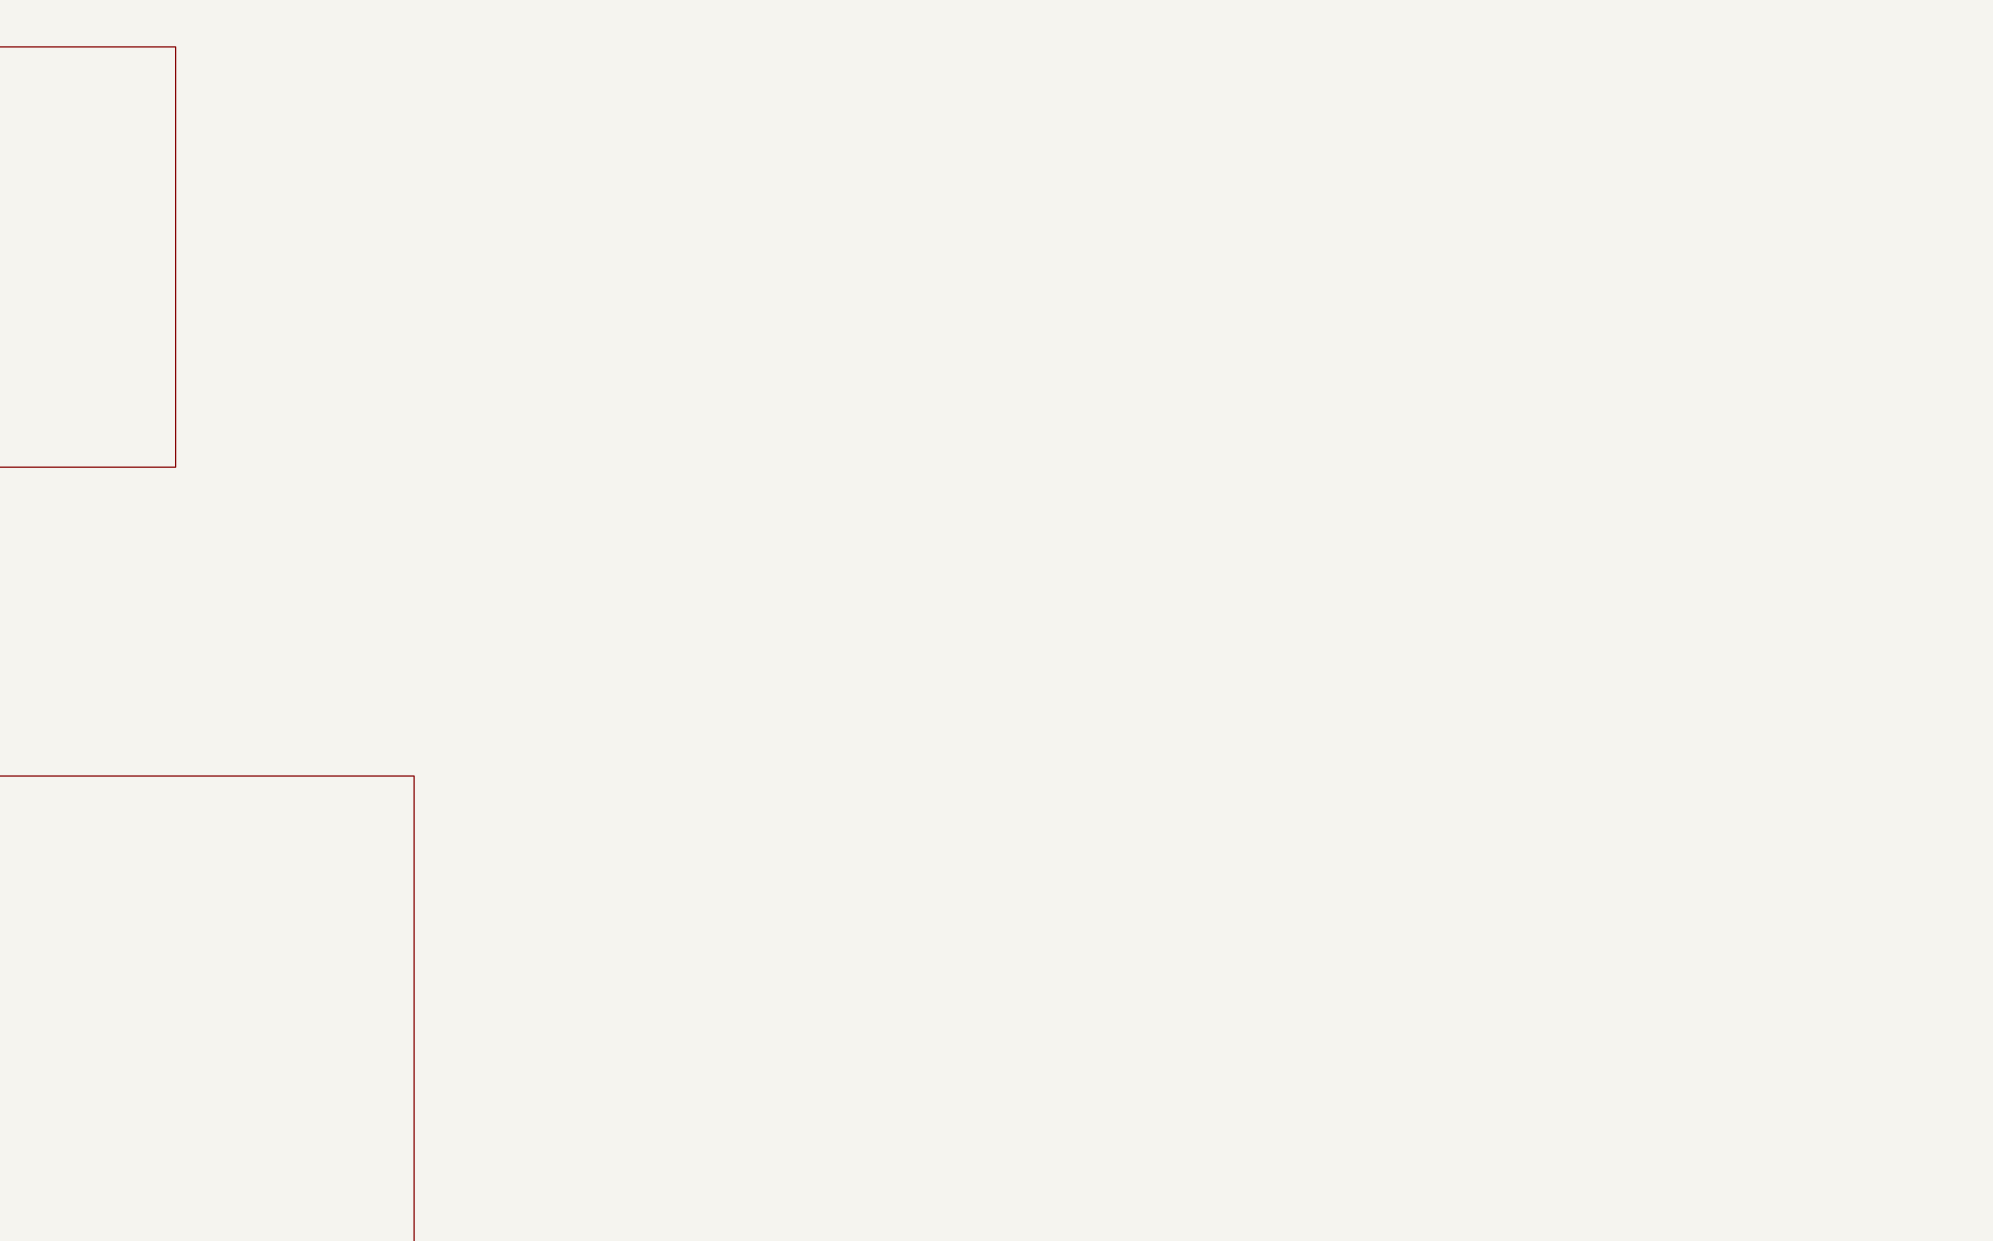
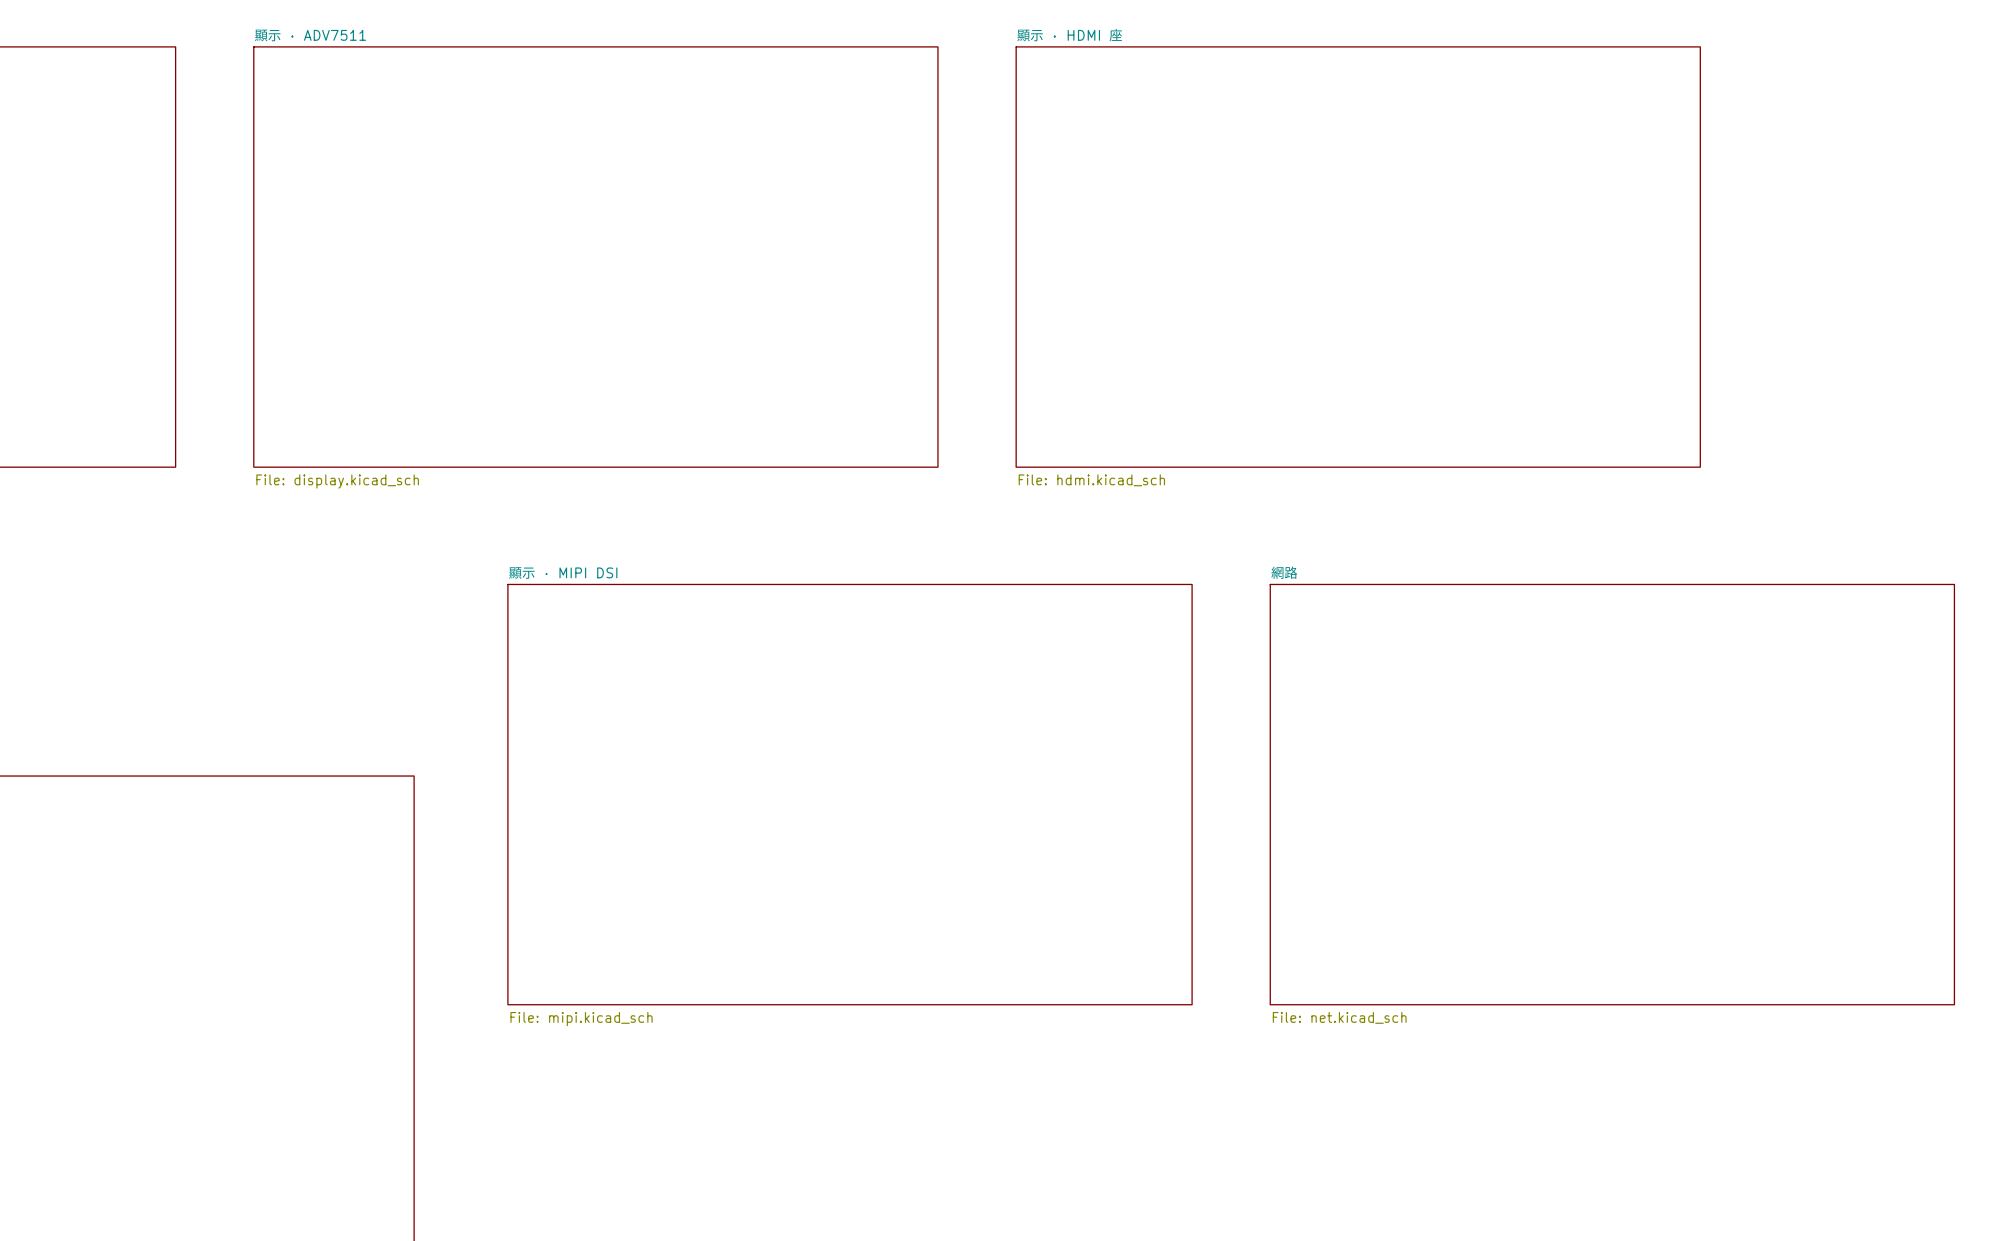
sheet 顯示 · ADV7511: none -> File: display.kicad_sch (595, 257)
sheet 顯示 · HDMI 座: none -> File: hdmi.kicad_sch (1358, 257)
sheet 顯示 · MIPI DSI: none -> File: mipi.kicad_sch (850, 794)
sheet 網路: none -> File: net.kicad_sch (1612, 794)

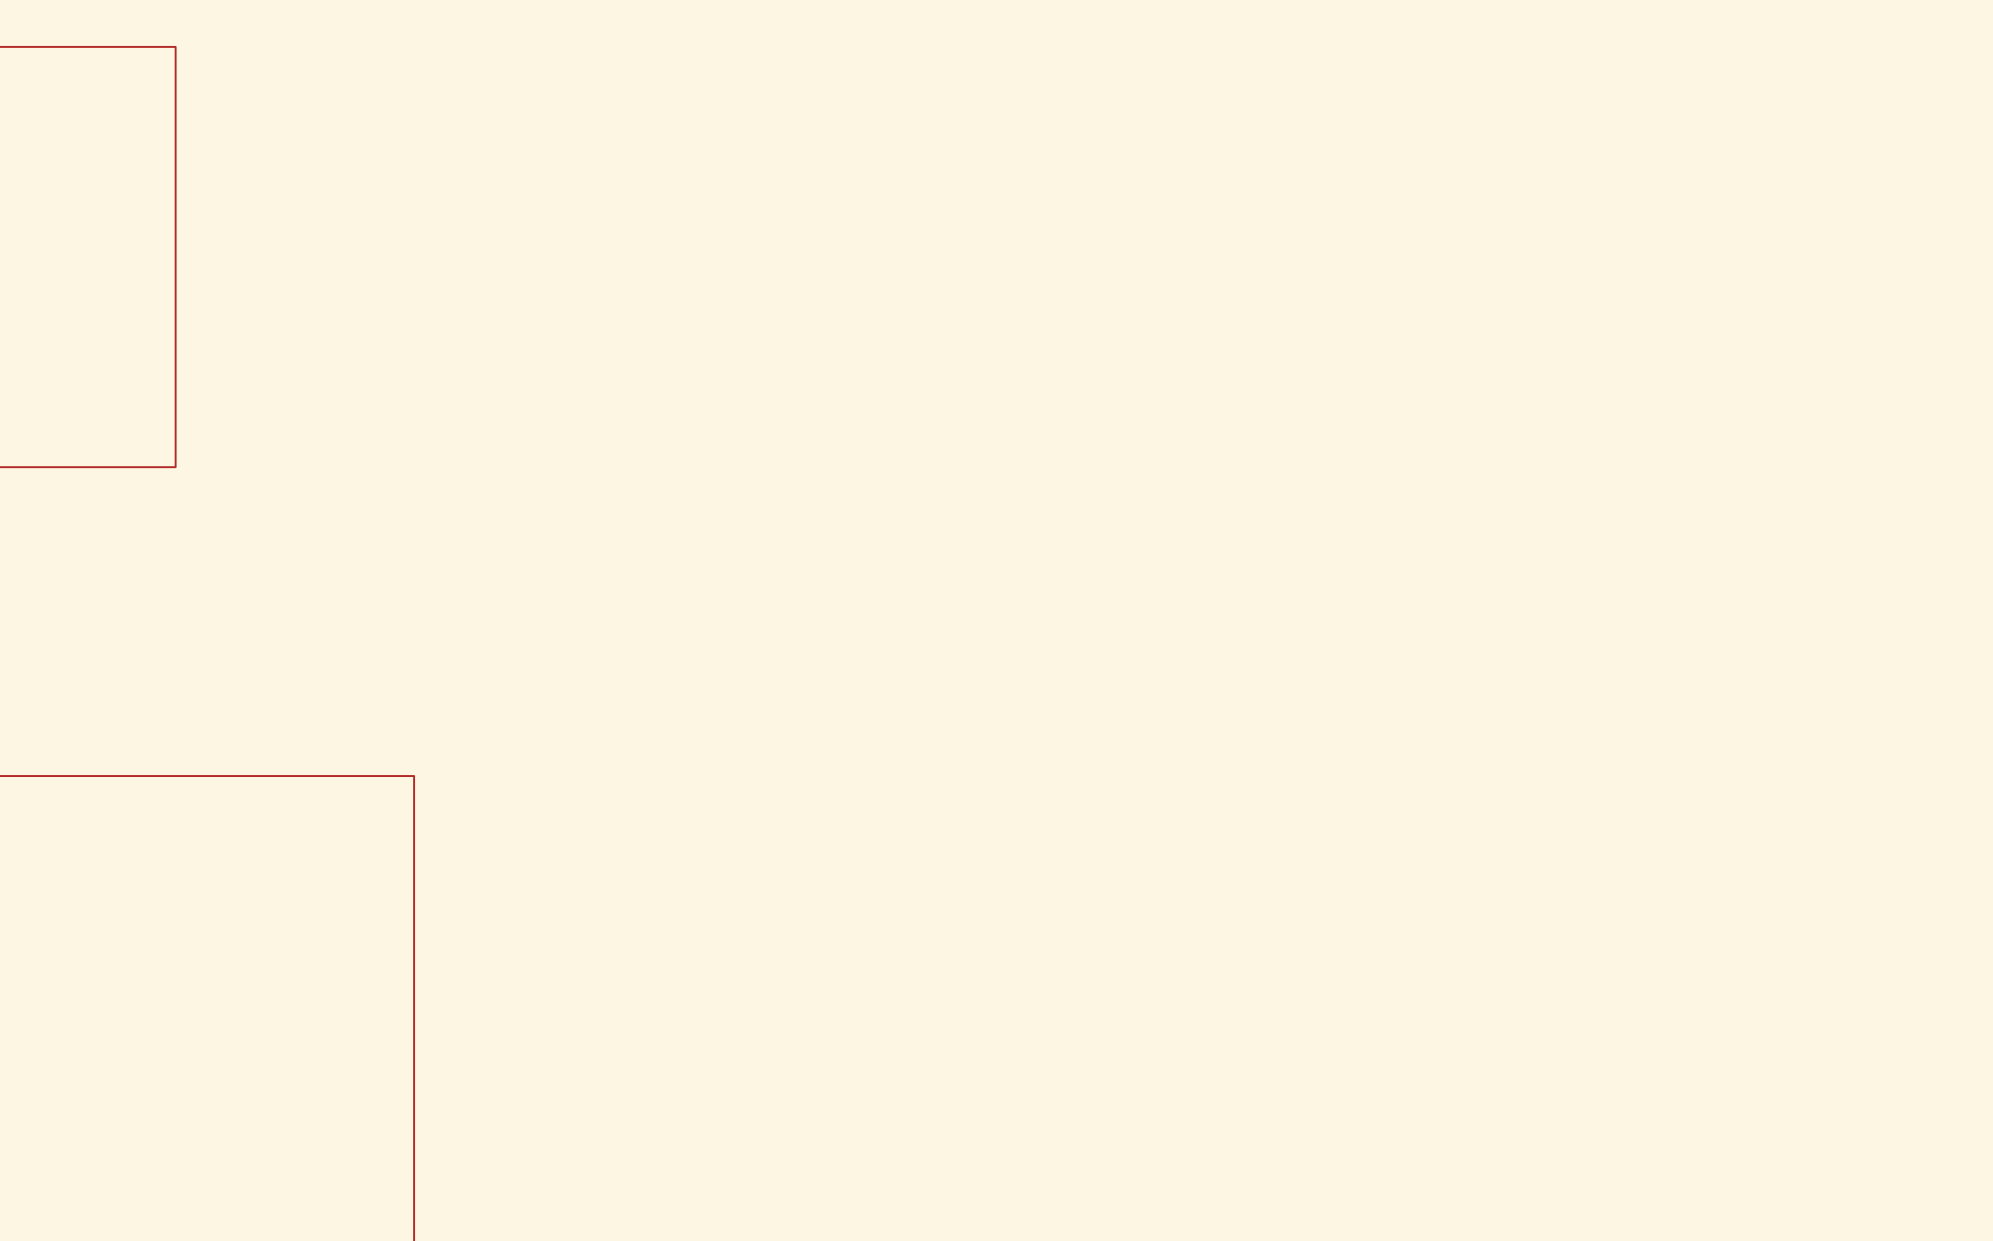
sheet 顯示 · ADV7511: File: display.kicad_sch (595, 257) -> none
sheet 顯示 · HDMI 座: File: hdmi.kicad_sch (1358, 257) -> none
sheet 顯示 · MIPI DSI: File: mipi.kicad_sch (850, 794) -> none
sheet 網路: File: net.kicad_sch (1612, 794) -> none

